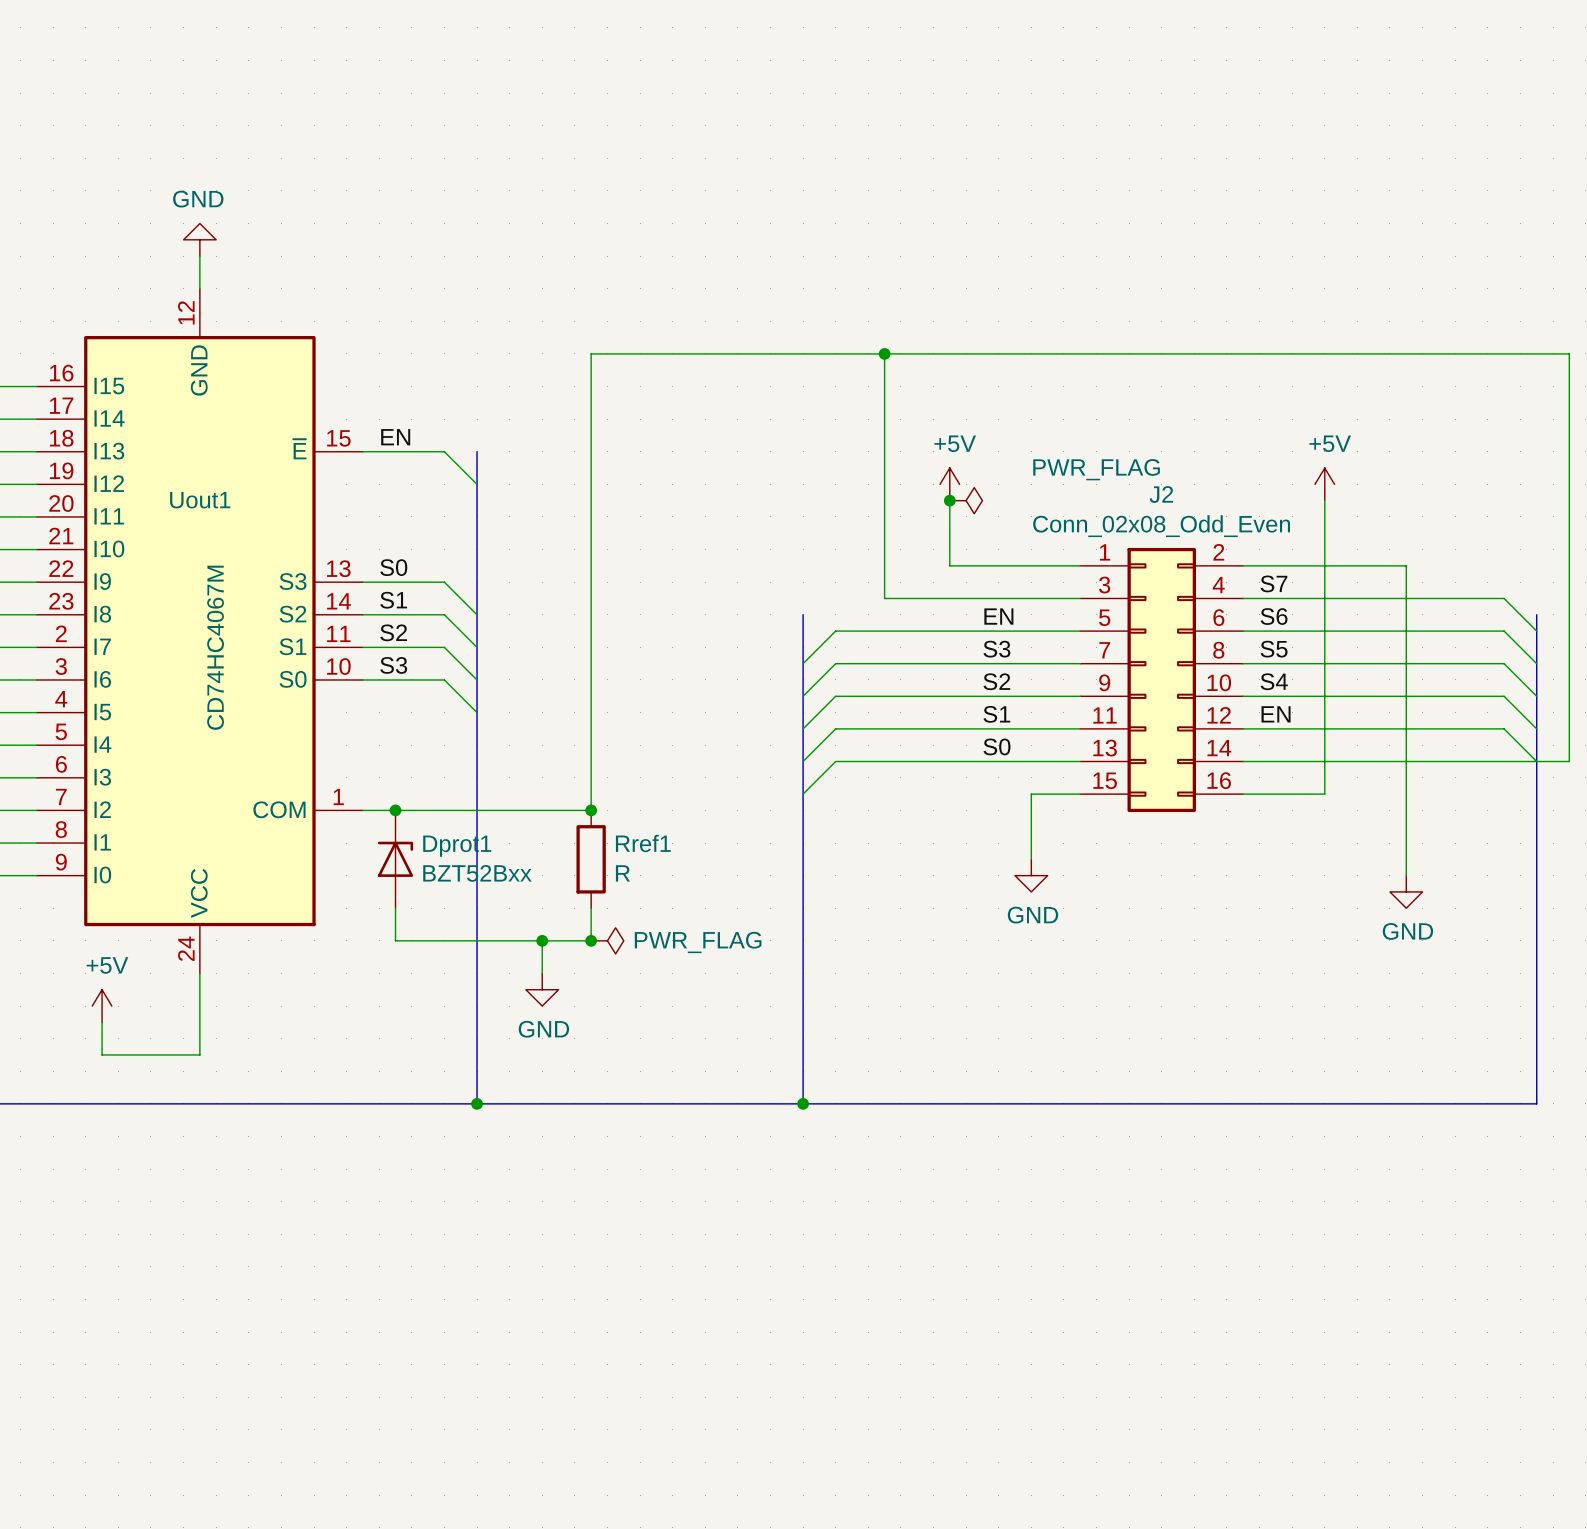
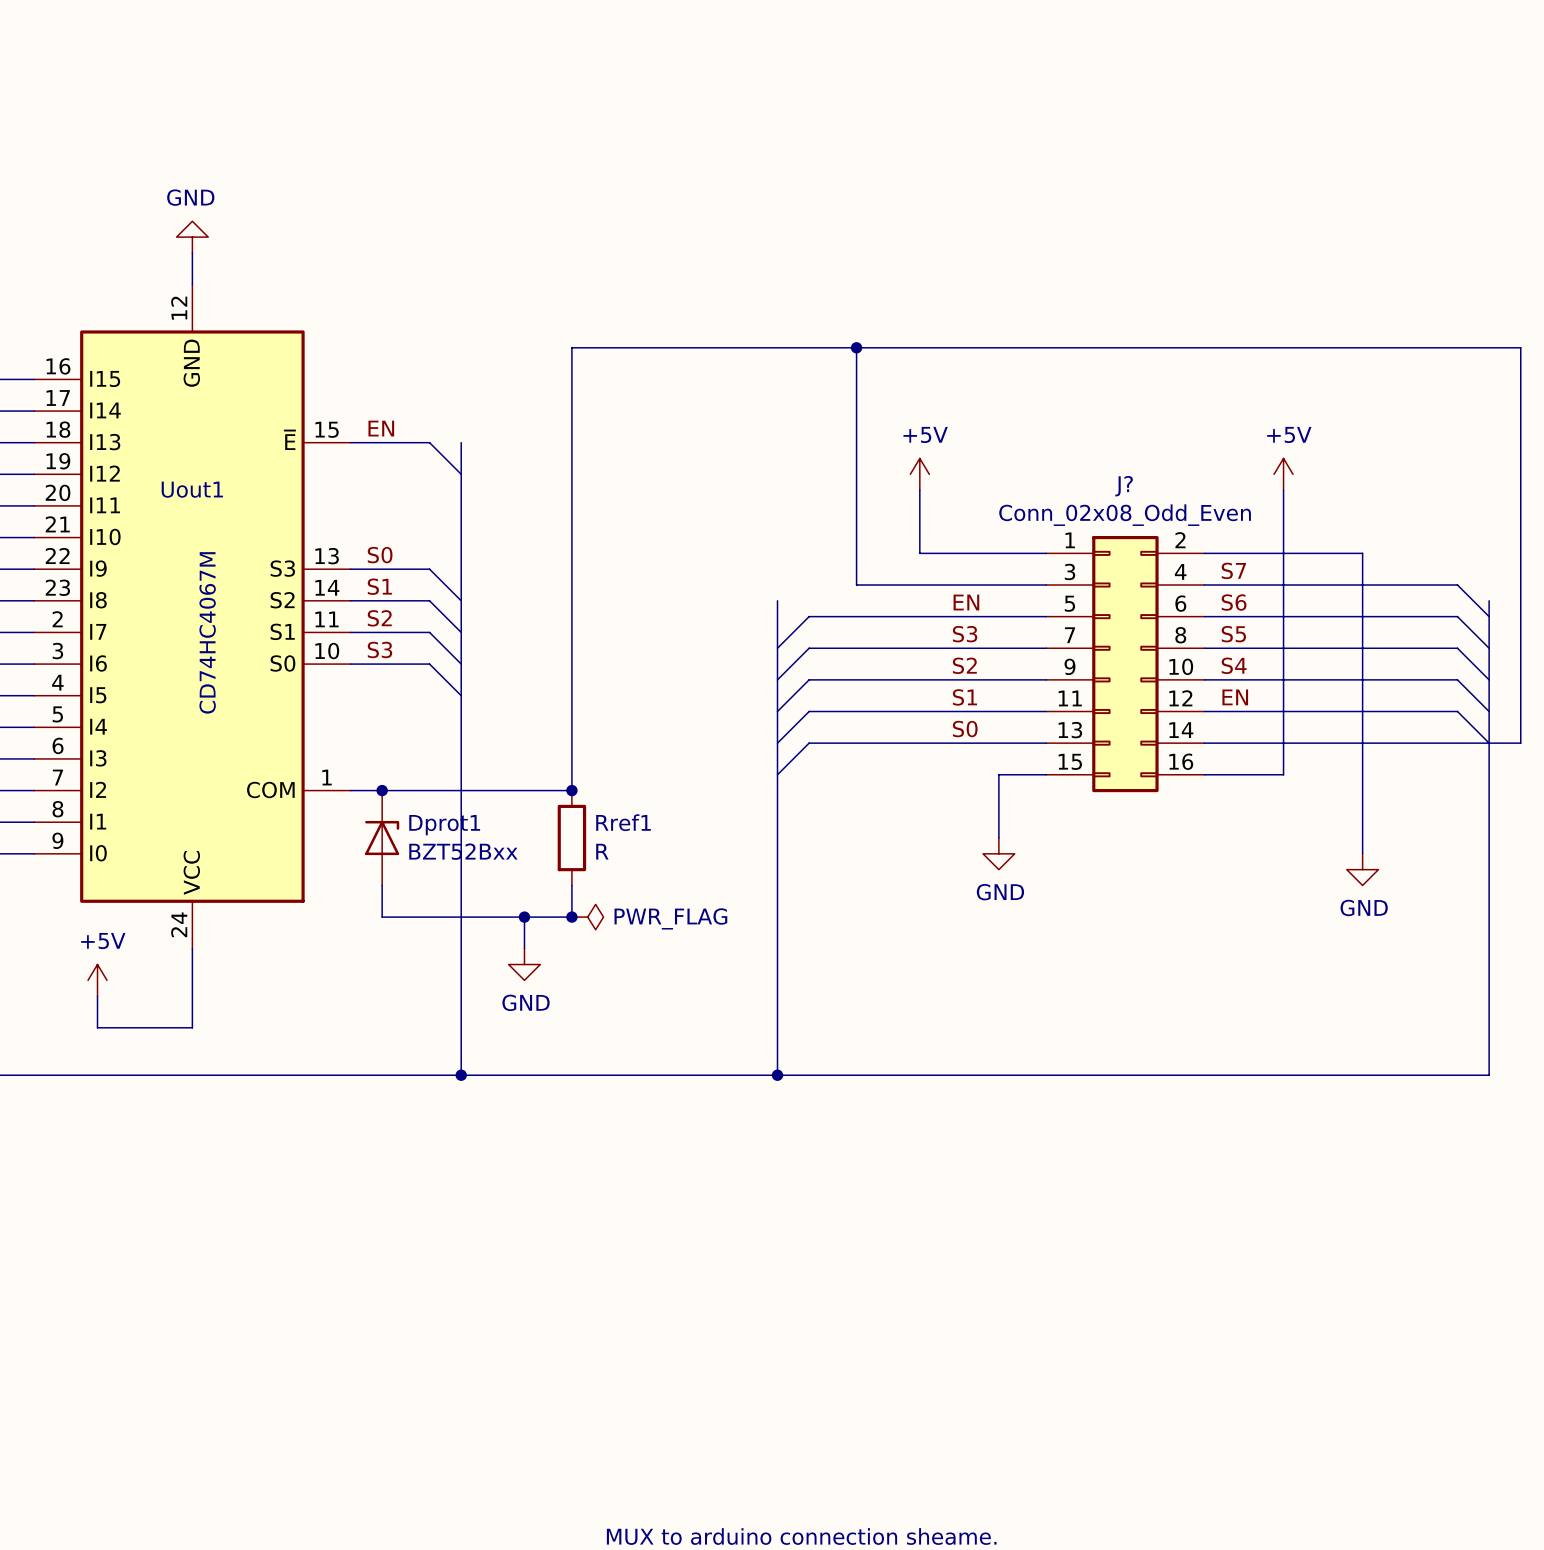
J2 name: J2 (1161, 494) -> J? (1124, 486)
junction: (949, 500) -> none
power symbol: PWR_FLAG (966, 500) -> none

